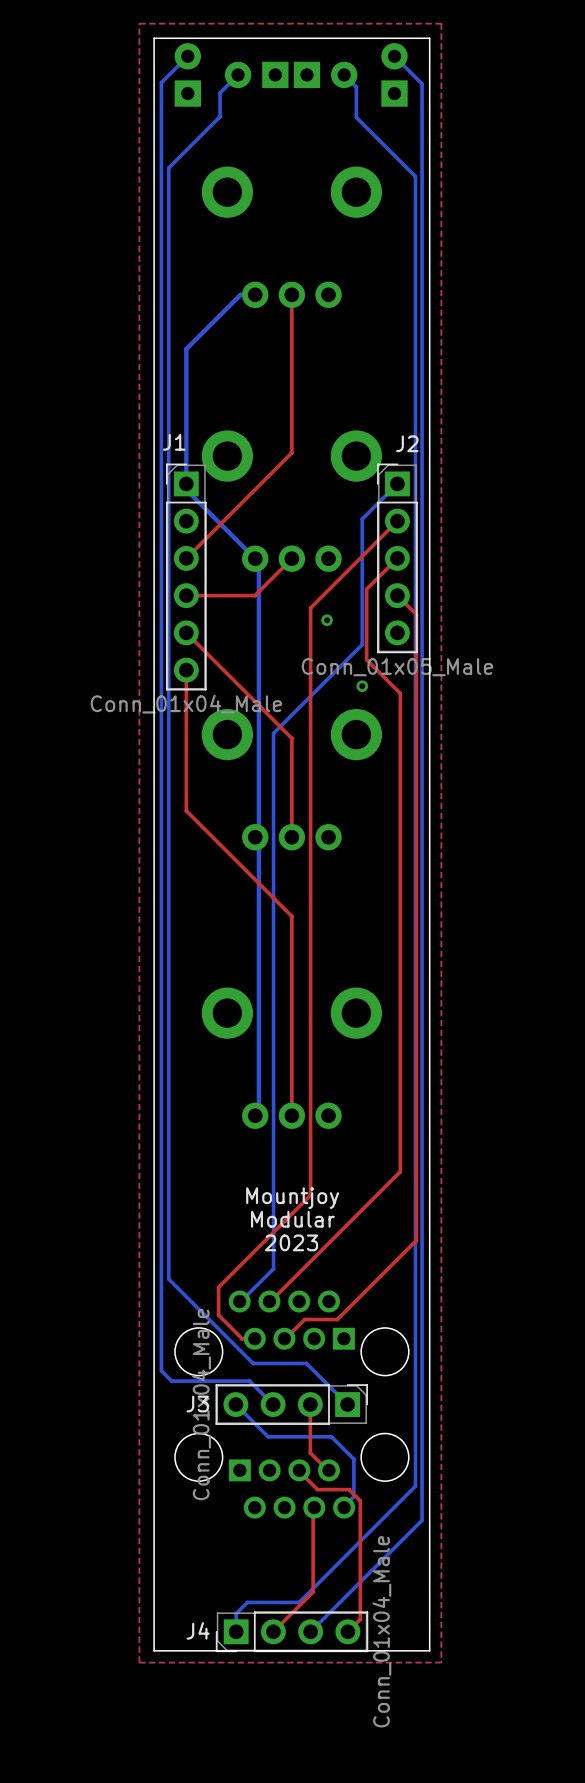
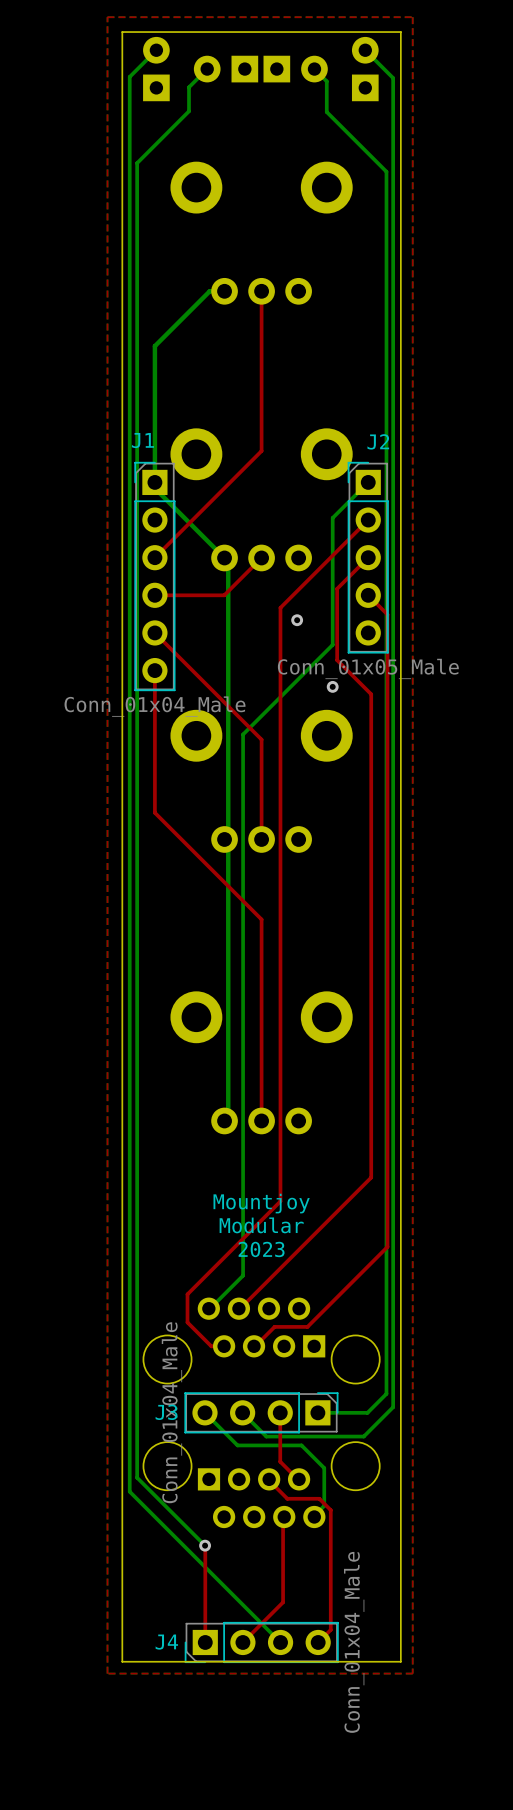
bottom track: (168, 1279) (253, 1363) (306, 1363) (347, 1404) -> (137, 1286) (137, 1477) (205, 1545)
bottom track: (161, 1370) (171, 1381) (249, 1381) (273, 1404) -> (129, 1378) (129, 1491) (280, 1642)
bottom track: (415, 1385) (415, 1486) (299, 1602) (247, 1602) (236, 1613) (236, 1631) -> (386, 1393) (367, 1412) (317, 1412)
bottom track: (422, 1398) (422, 1520) (310, 1631) -> (393, 1407) (363, 1436) (266, 1436) (242, 1412)
top track: none -> (205, 1545) (205, 1642)
via: none -> (205, 1545)

